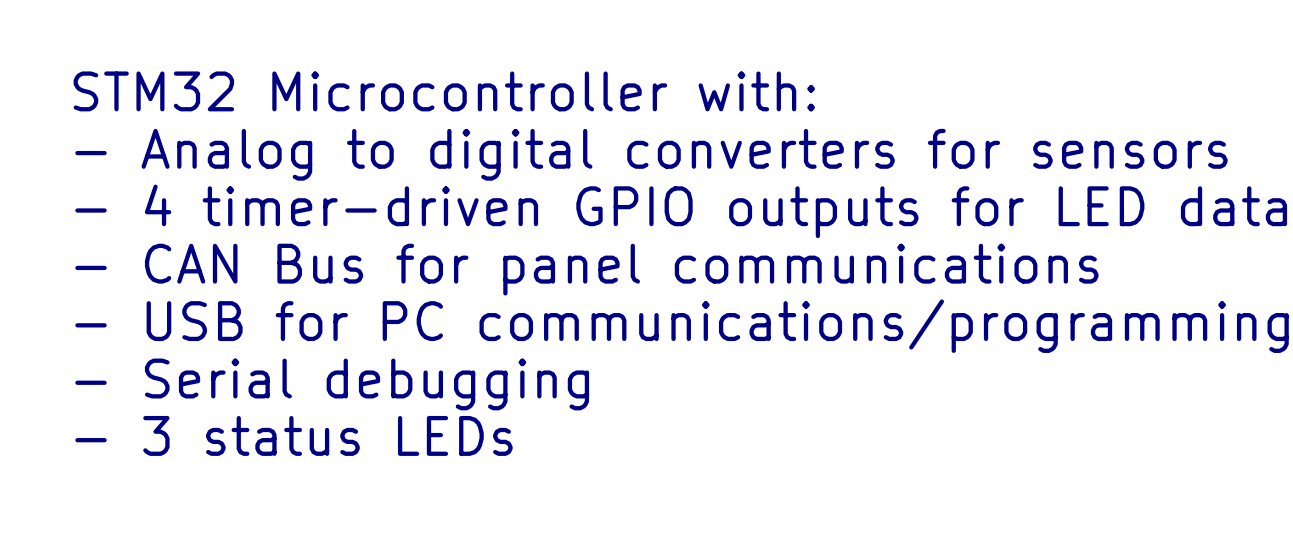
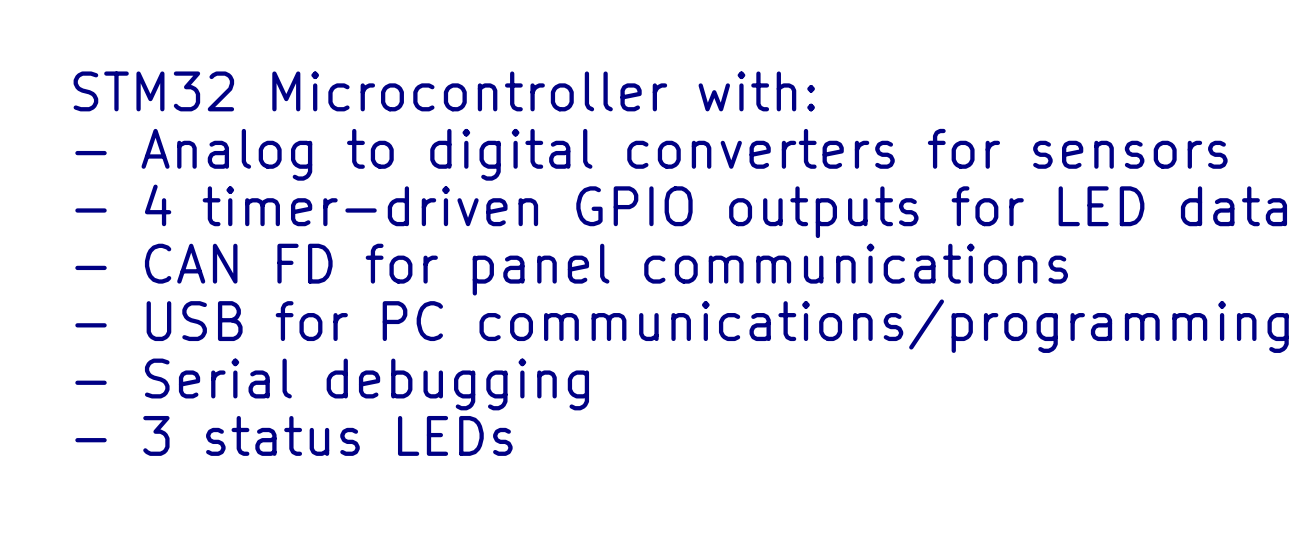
text: - CAN Bus for panel communications (586, 269) -> - CAN FD for panel communications (571, 269)

